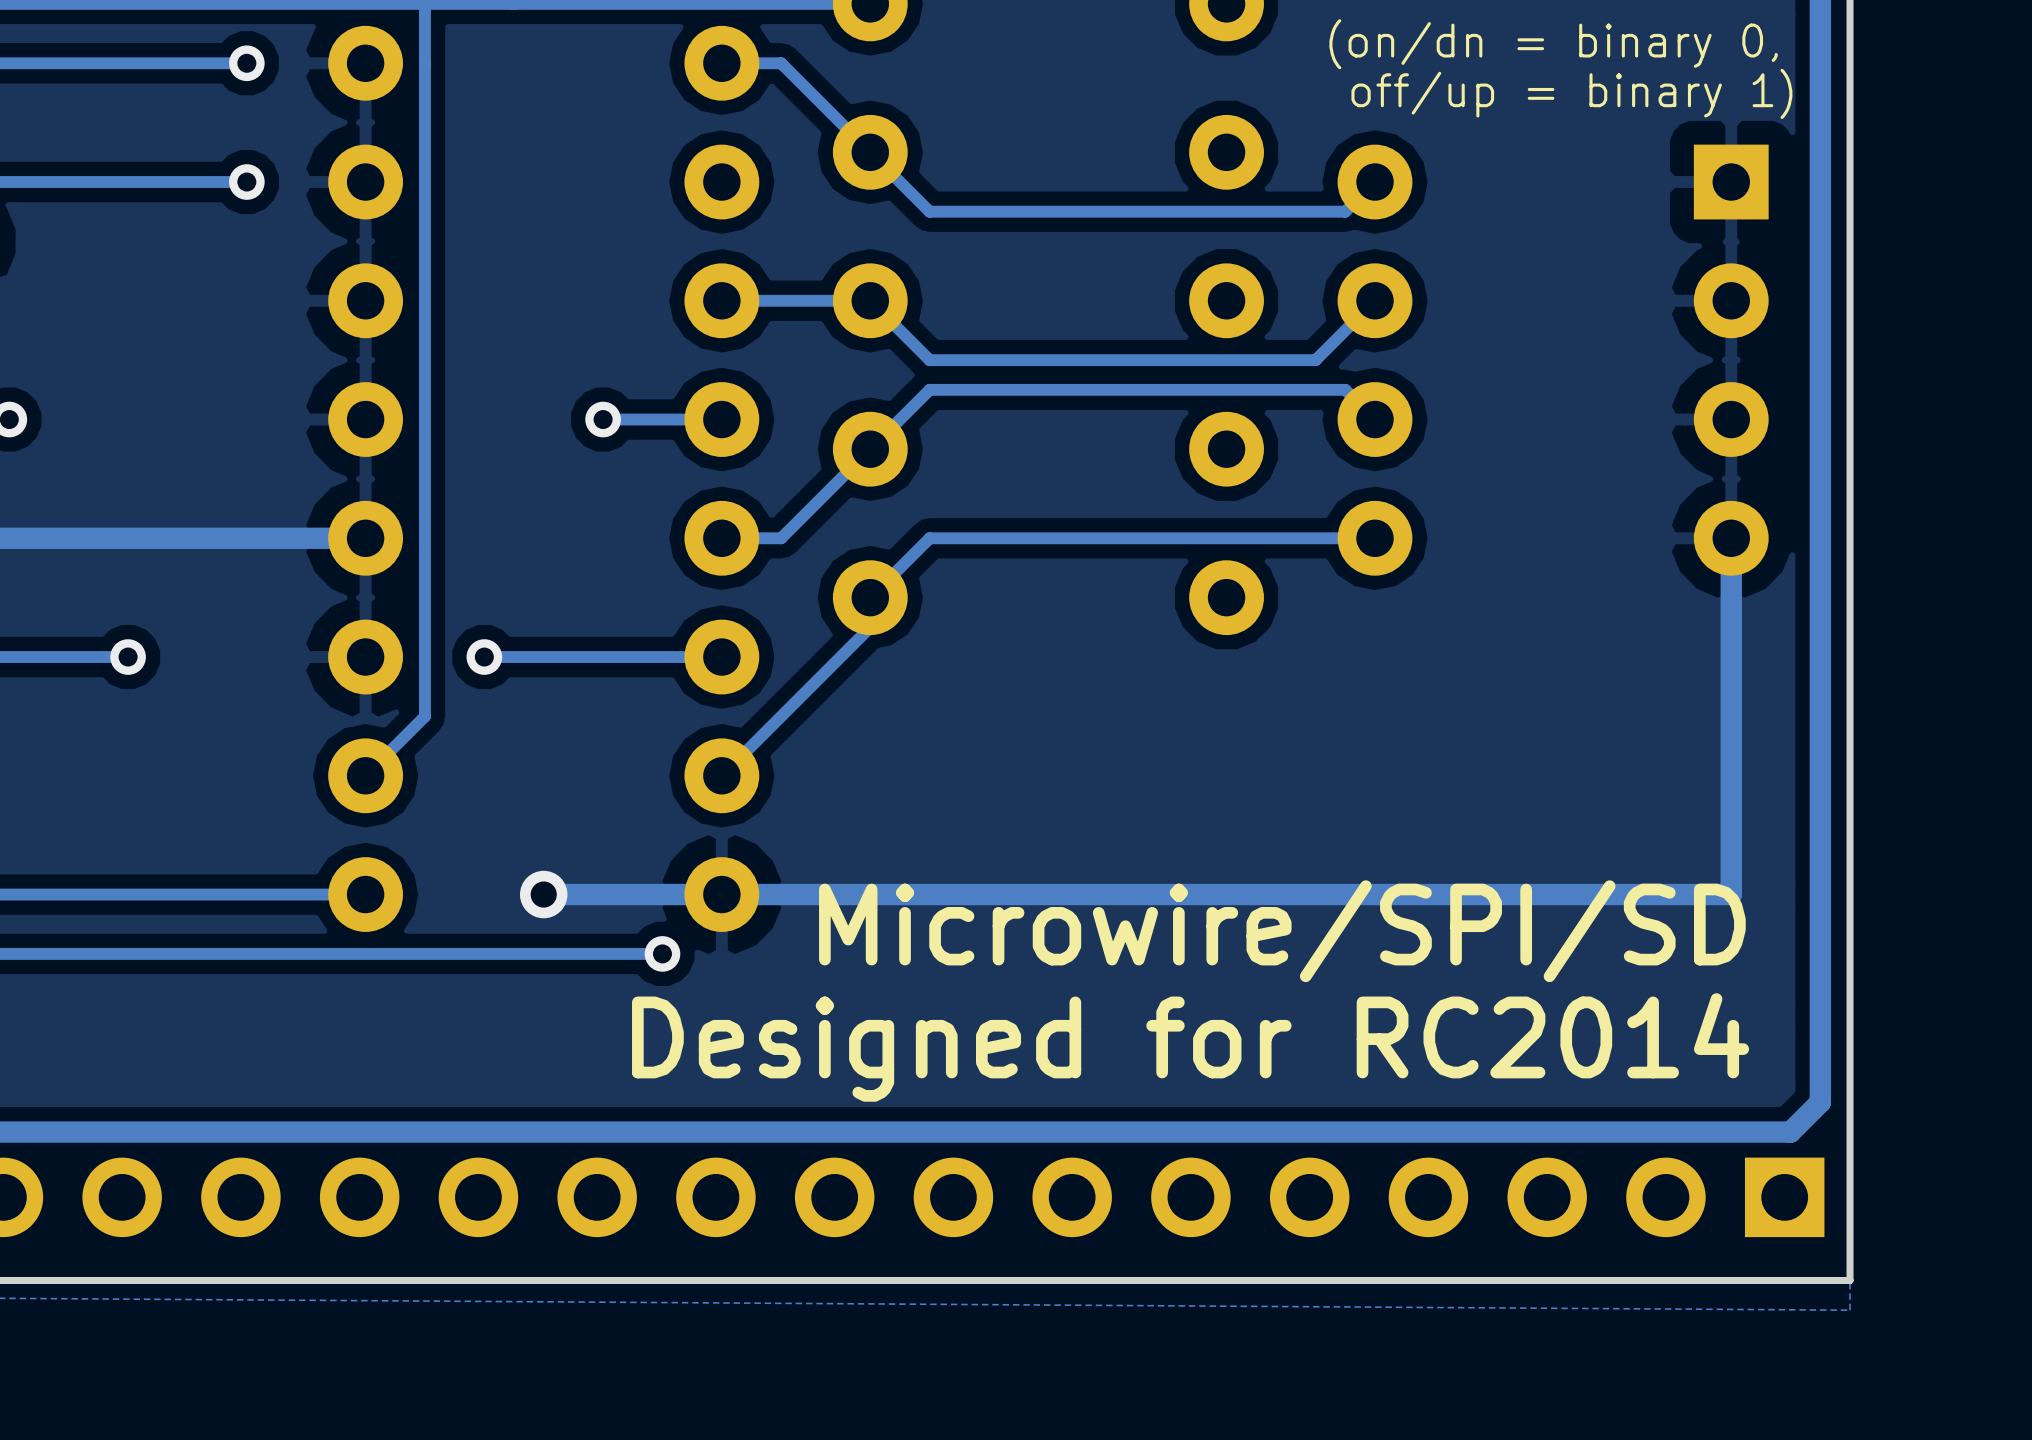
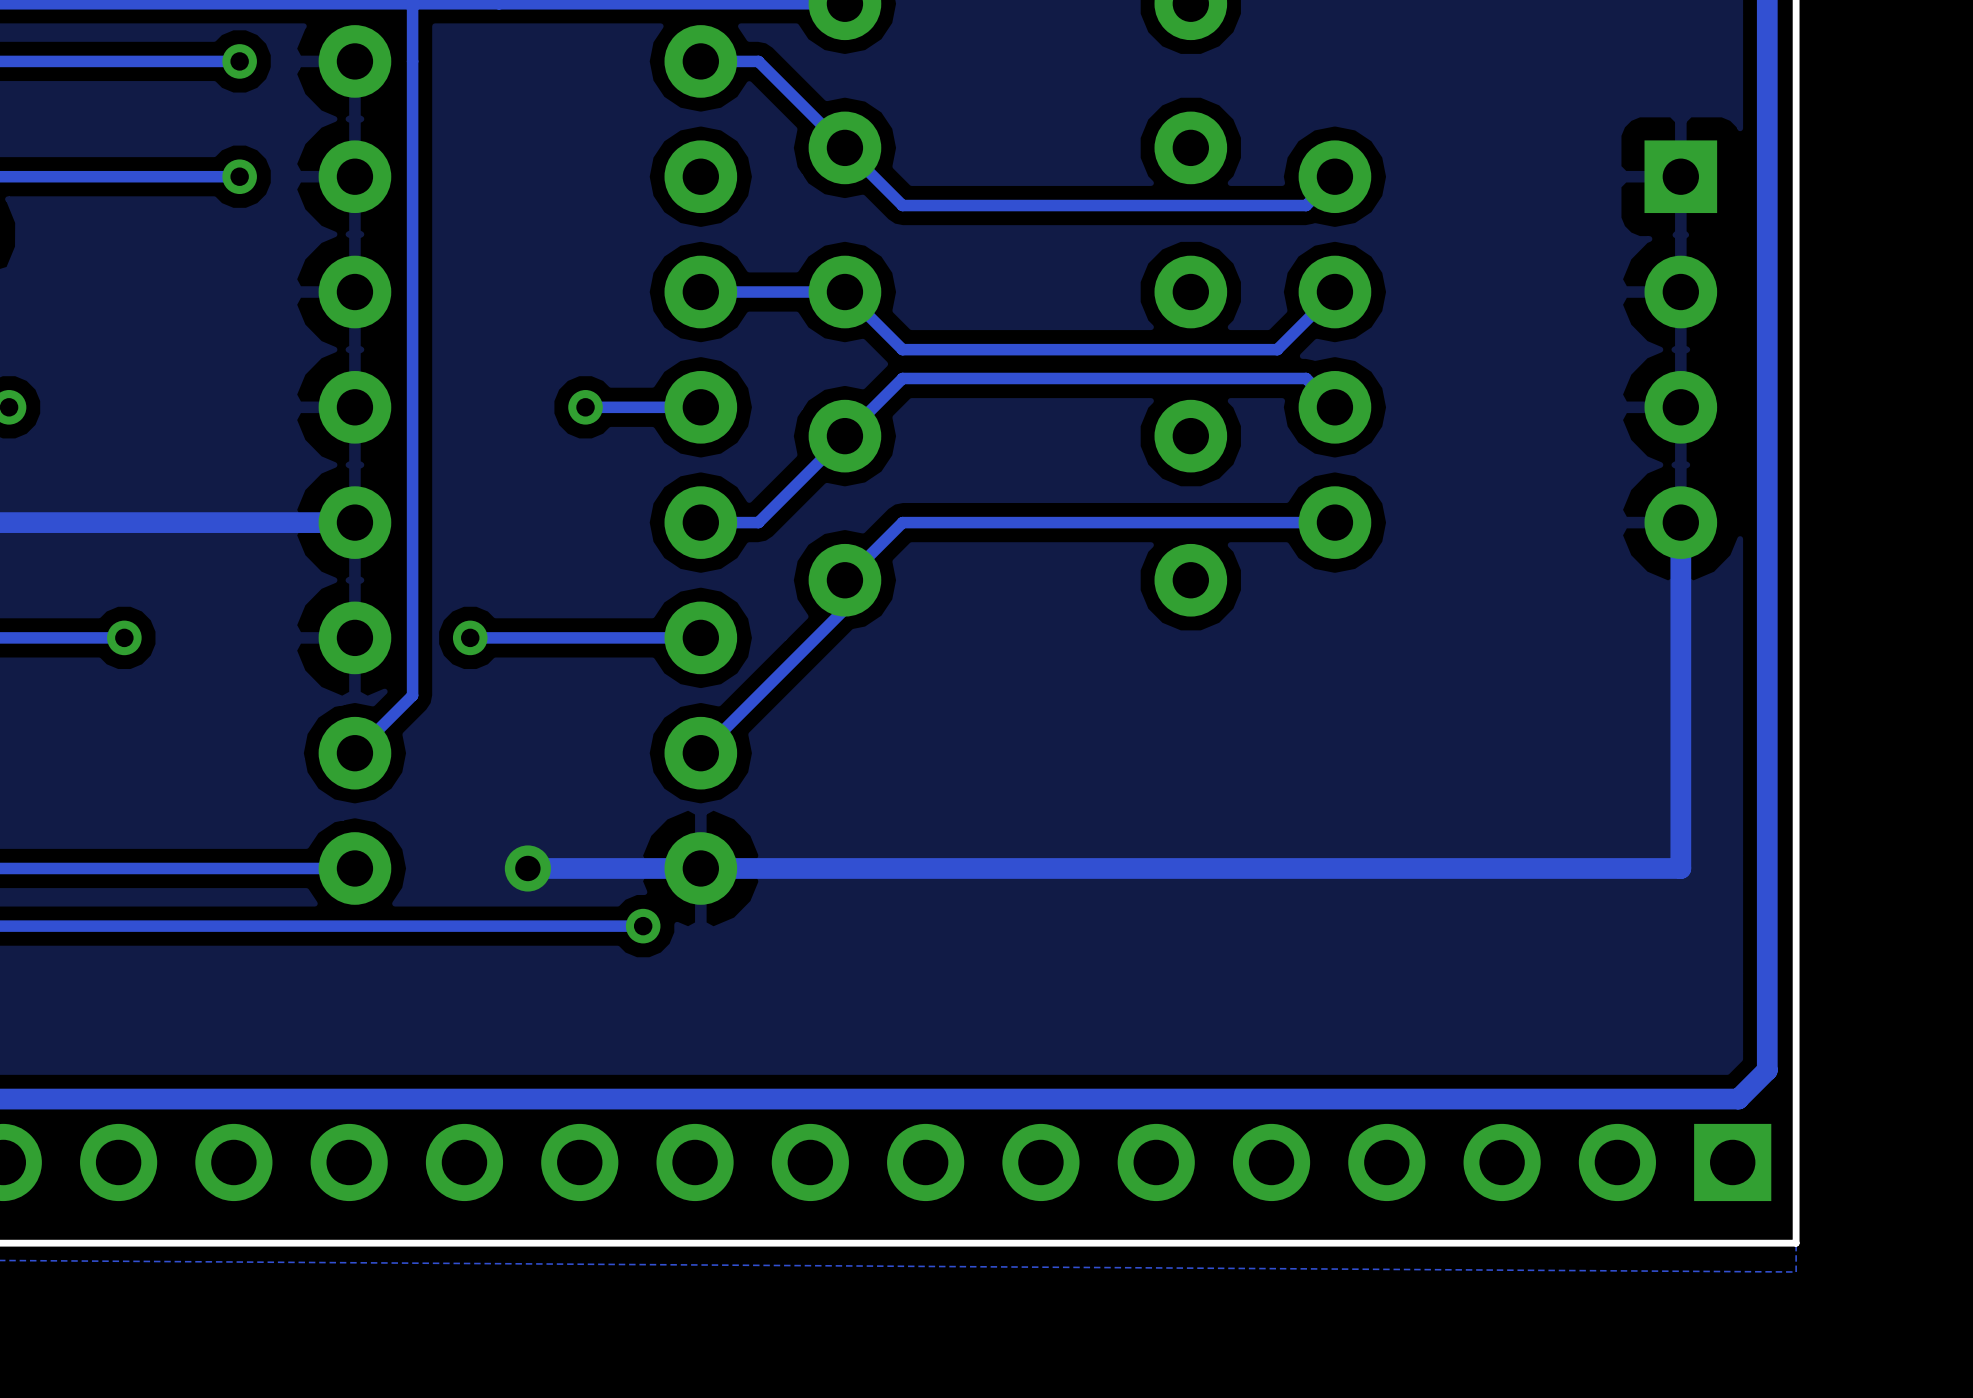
text: (on/dn = binary 0, (1553, 44) -> none
text: off/up = binary 1) (1571, 93) -> none
text: Microwire/SPI/SD (1282, 931) -> none
text: Designed for RC2014 (1190, 1047) -> none

